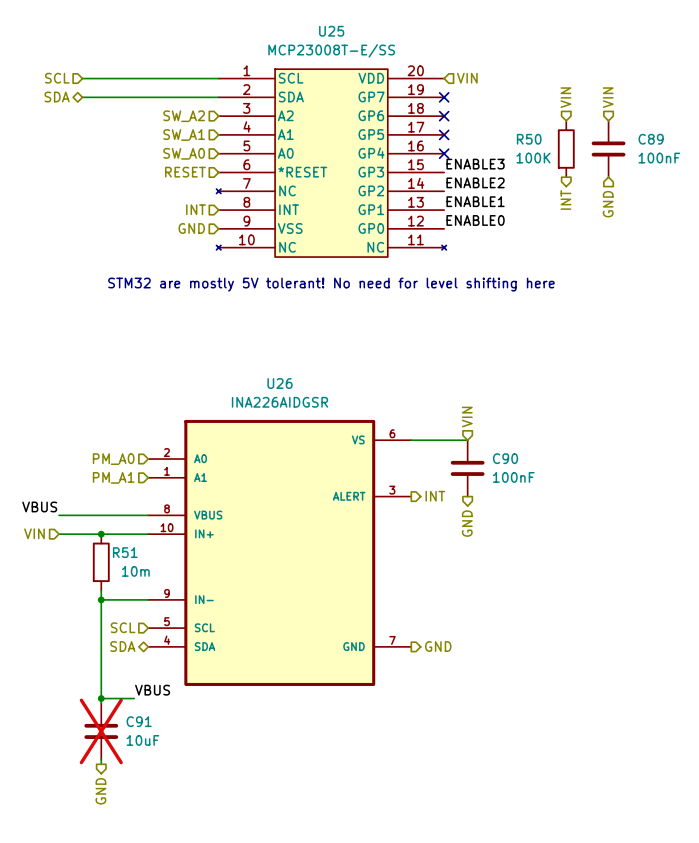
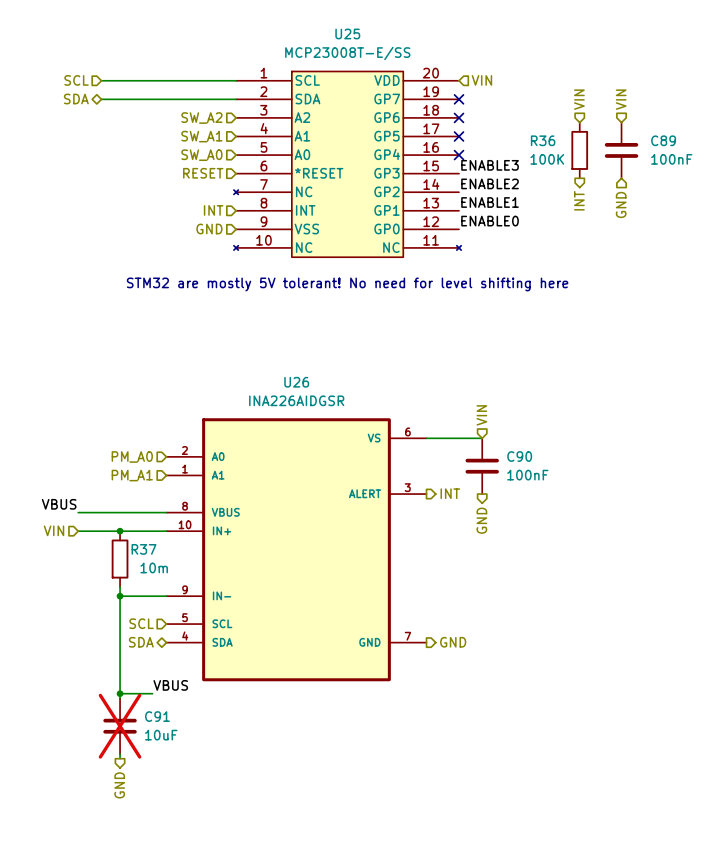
R50 name: R50 (529, 139) -> R36 (543, 140)
R51 name: R51 (125, 552) -> R37 (143, 549)

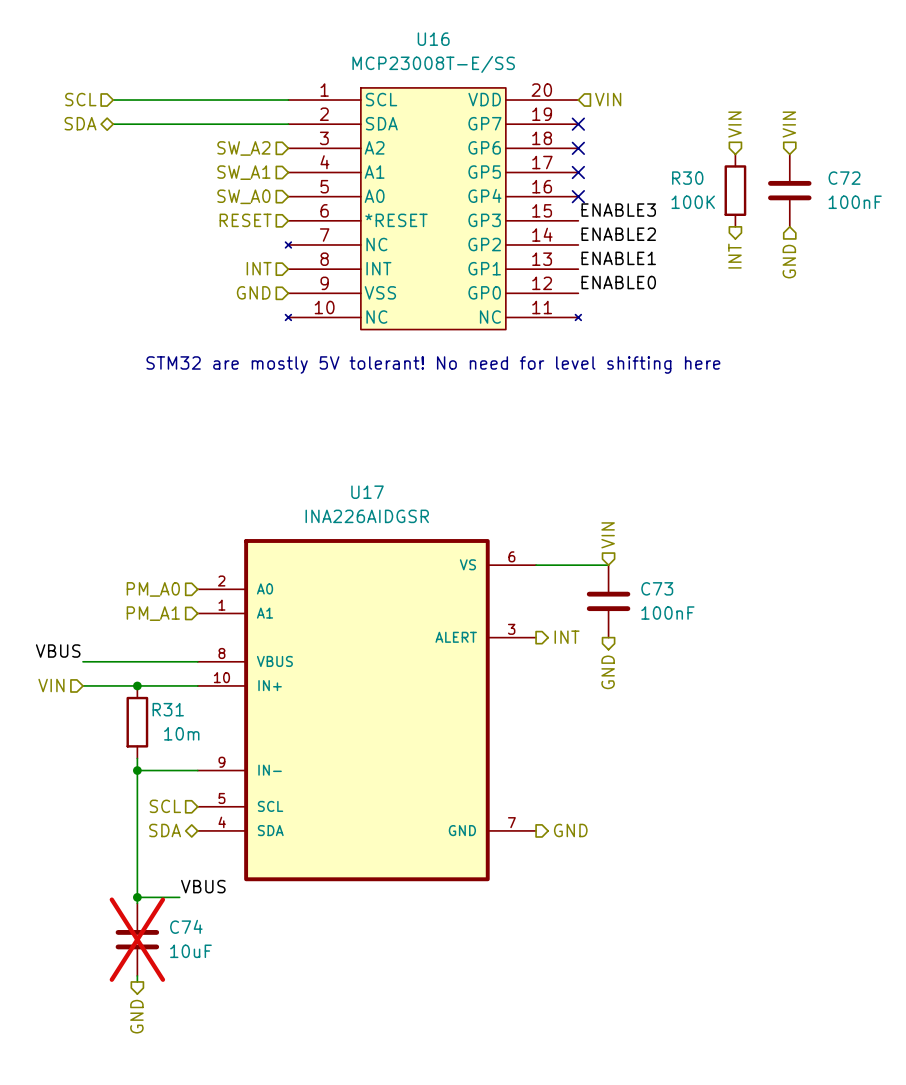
U25 name: U25 (347, 33) -> U16 (433, 39)
R36 name: R36 (543, 140) -> R30 (687, 178)
C89 name: C89 (663, 140) -> C72 (844, 178)
U26 name: U26 (296, 382) -> U17 (367, 492)
C90 name: C90 (519, 456) -> C73 (657, 588)
R37 name: R37 (143, 549) -> R31 (168, 709)
C91 name: C91 (157, 716) -> C74 (186, 926)

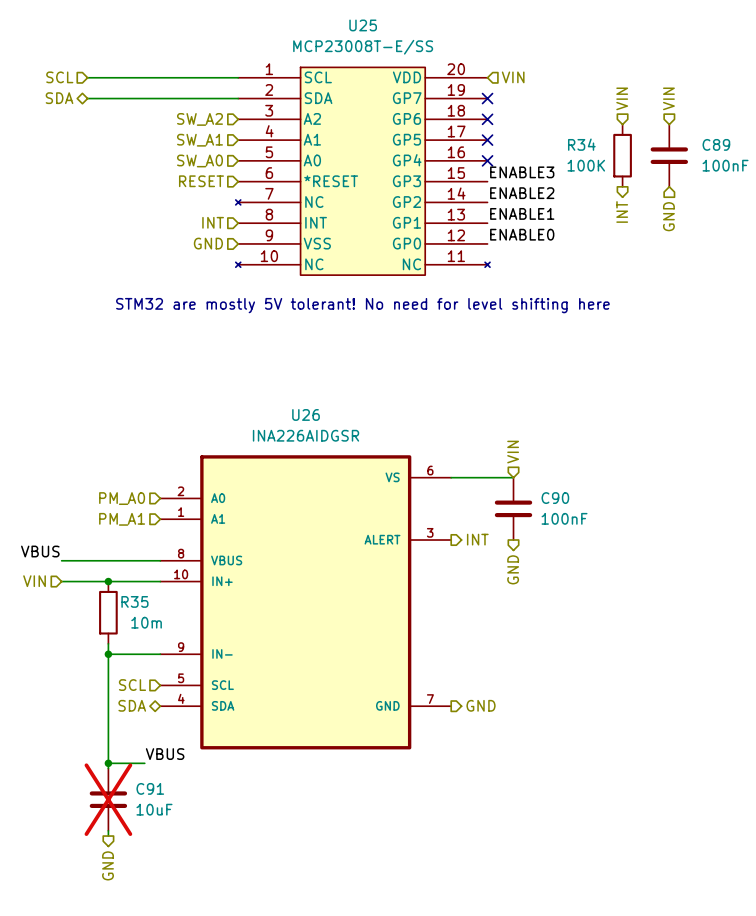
U16 name: U16 (433, 39) -> U25 (363, 25)
R30 name: R30 (687, 178) -> R34 (581, 144)
C72 name: C72 (844, 178) -> C89 (716, 144)
U17 name: U17 (367, 492) -> U26 (306, 414)
C73 name: C73 (657, 588) -> C90 (555, 498)
R31 name: R31 (168, 709) -> R35 (134, 601)
C74 name: C74 (186, 926) -> C91 (150, 788)

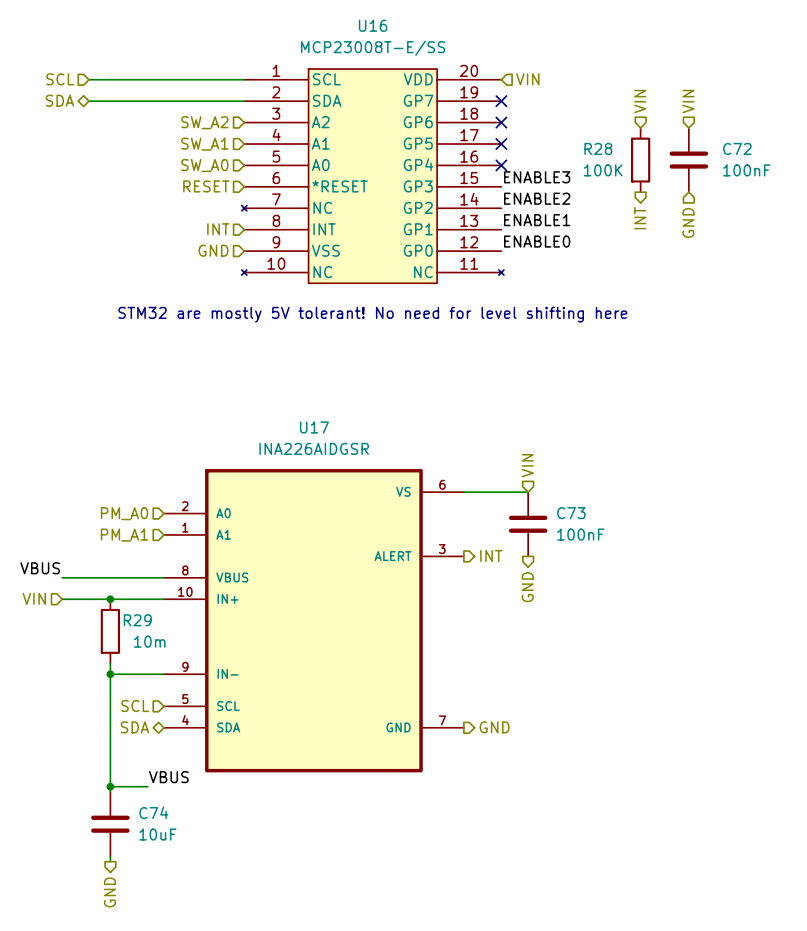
U25 name: U25 (363, 25) -> U16 (373, 25)
R34 name: R34 (581, 144) -> R28 (598, 148)
C89 name: C89 (716, 144) -> C72 (737, 148)
U26 name: U26 (306, 414) -> U17 (314, 427)
C90 name: C90 (555, 498) -> C73 (571, 513)
R35 name: R35 (134, 601) -> R29 (137, 620)
C91 name: C91 (150, 788) -> C74 (153, 812)
C91 do-not-place cross: (108, 799) -> none

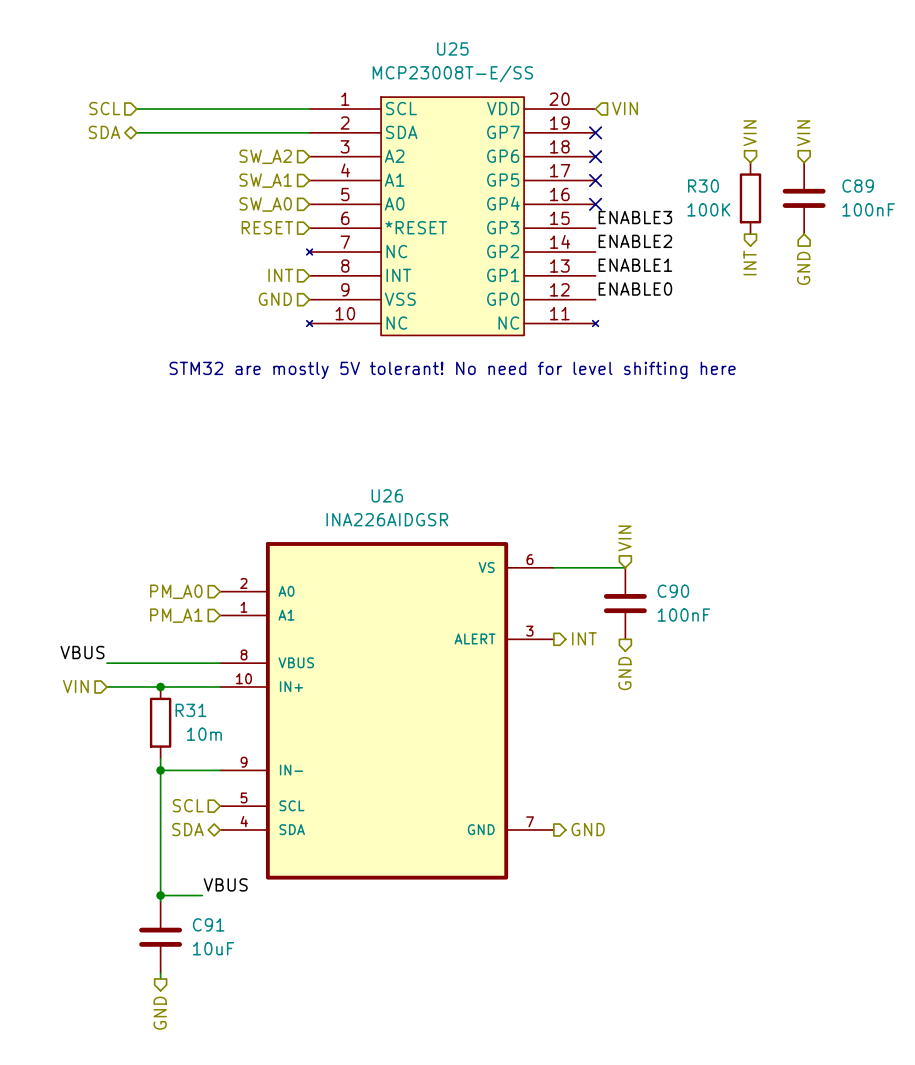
U16 name: U16 (373, 25) -> U25 (452, 48)
R28 name: R28 (598, 148) -> R30 (703, 186)
C72 name: C72 (737, 148) -> C89 (858, 186)
U17 name: U17 (314, 427) -> U26 (387, 495)
C73 name: C73 (571, 513) -> C90 (673, 591)
R29 name: R29 (137, 620) -> R31 (191, 710)
C74 name: C74 (153, 812) -> C91 (208, 924)

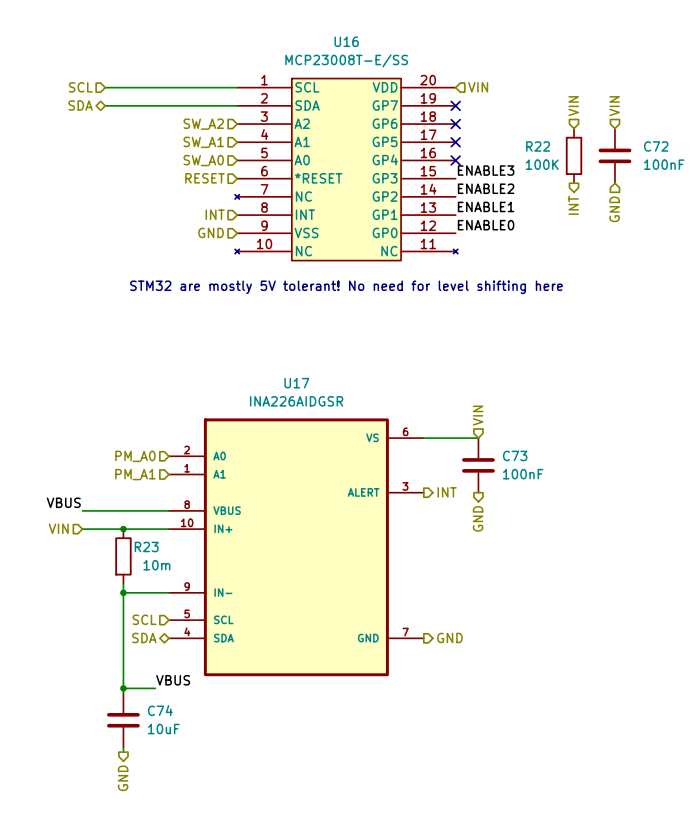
U25 name: U25 (452, 48) -> U16 (346, 41)
R30 name: R30 (703, 186) -> R22 (538, 146)
C89 name: C89 (858, 186) -> C72 (656, 146)
U26 name: U26 (387, 495) -> U17 (296, 383)
C90 name: C90 (673, 591) -> C73 (515, 455)
R31 name: R31 (191, 710) -> R23 (146, 546)
C91 name: C91 (208, 924) -> C74 (160, 710)

